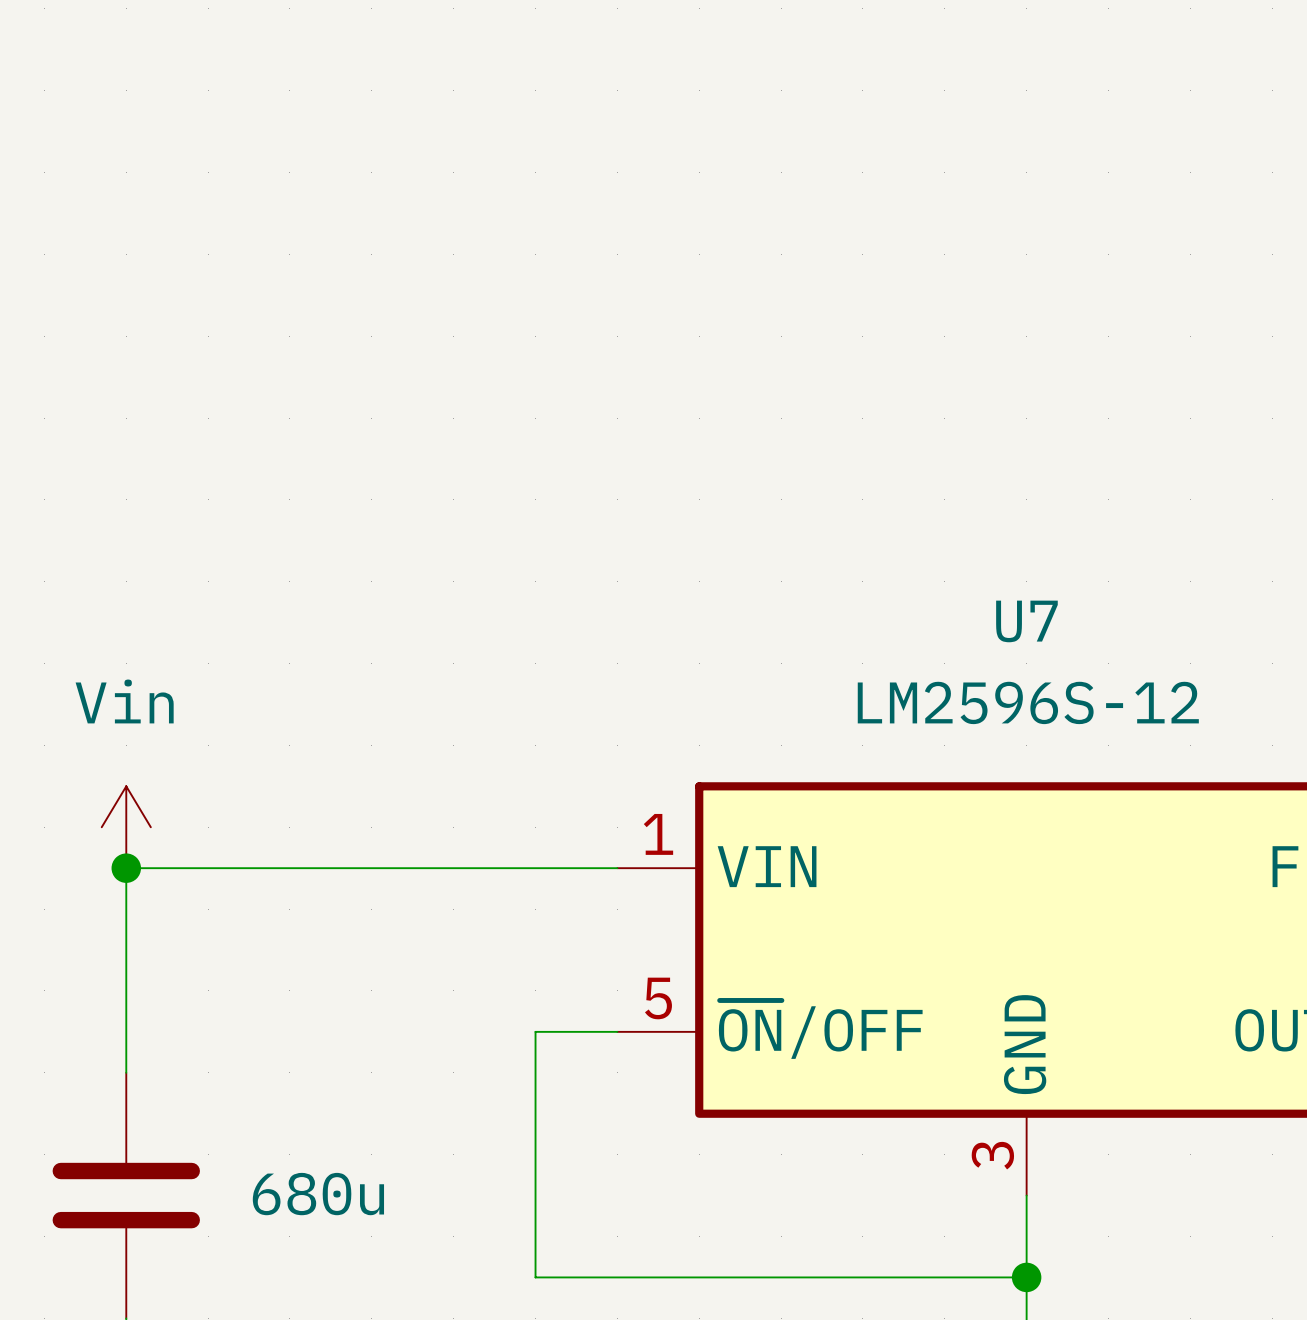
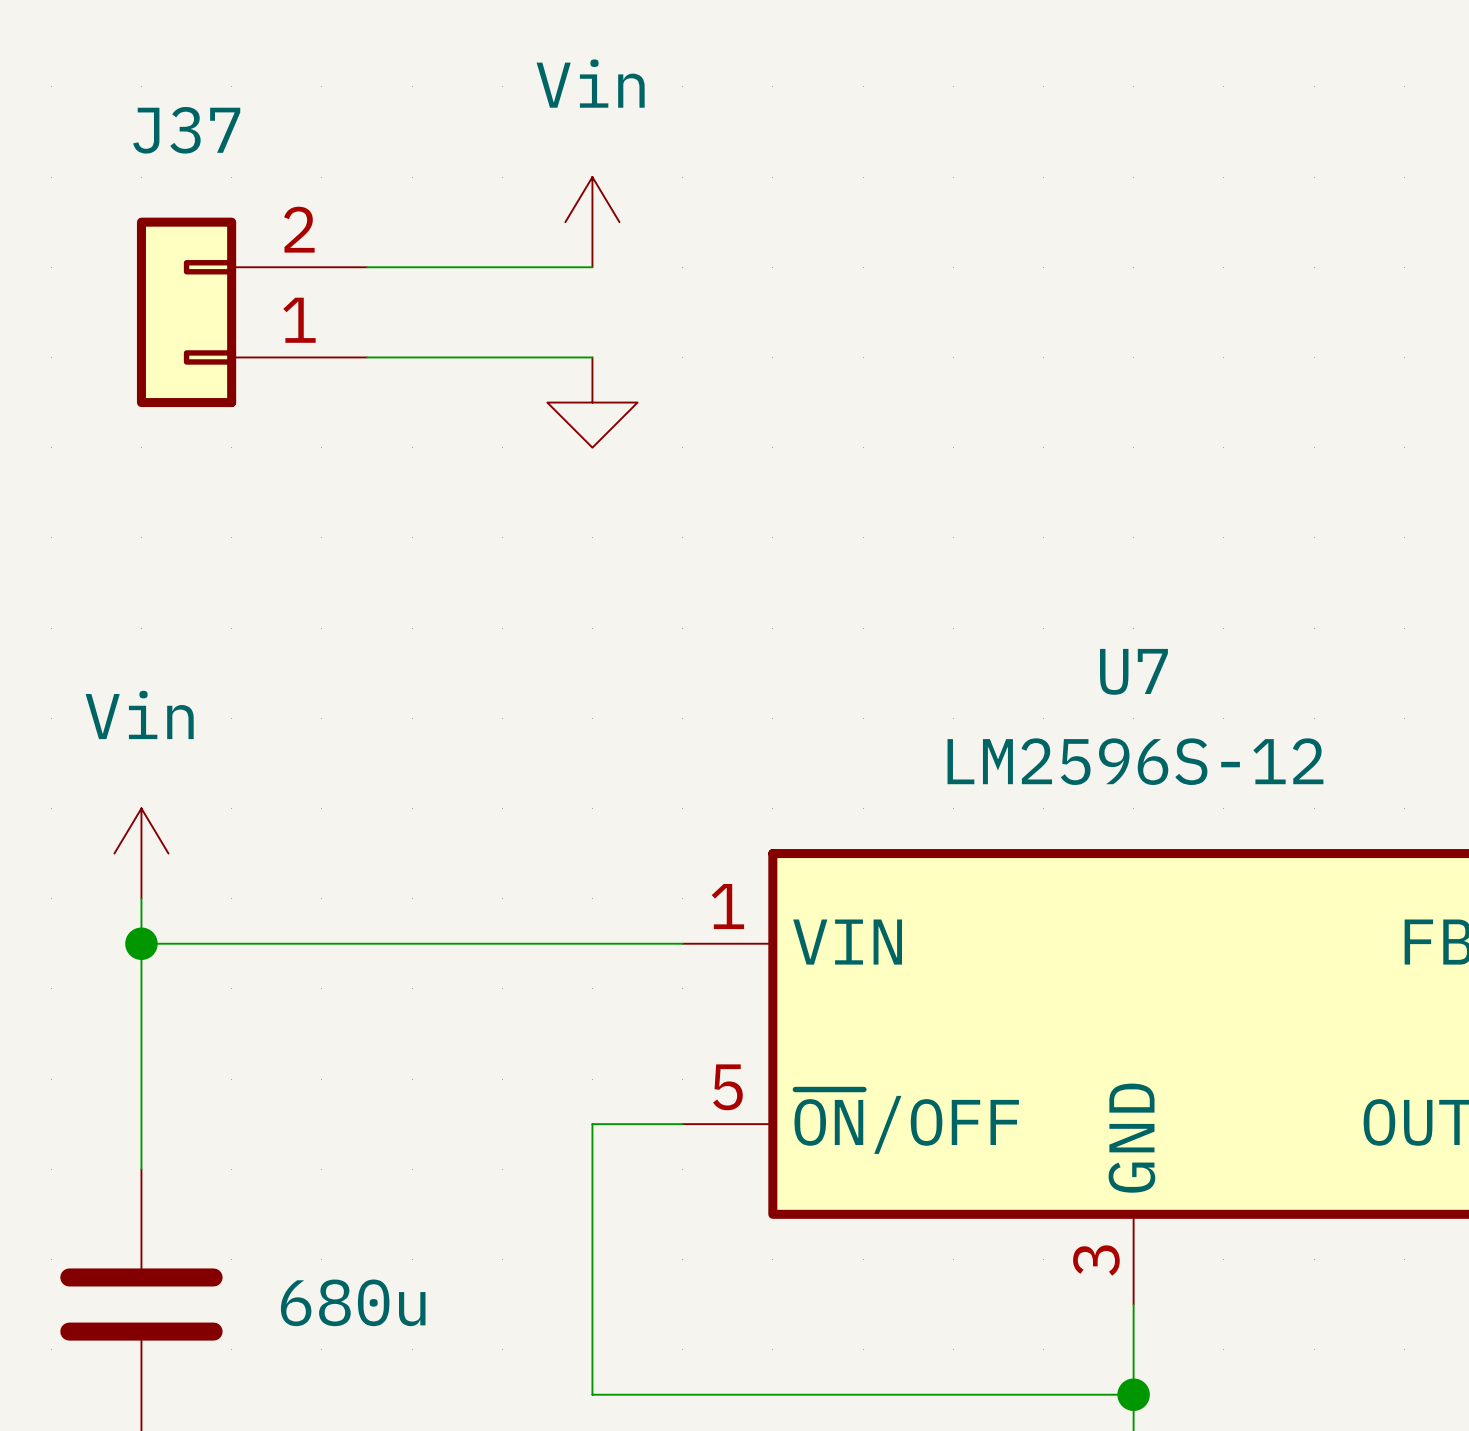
power symbol: none -> Vin (592, 222)
wire: none -> (366, 267) (592, 267)
J37: none -> (251, 312)
wire: none -> (366, 357) (592, 357)
power symbol: none -> (592, 402)
power symbol position: Vin (126, 827) -> Vin (141, 853)

